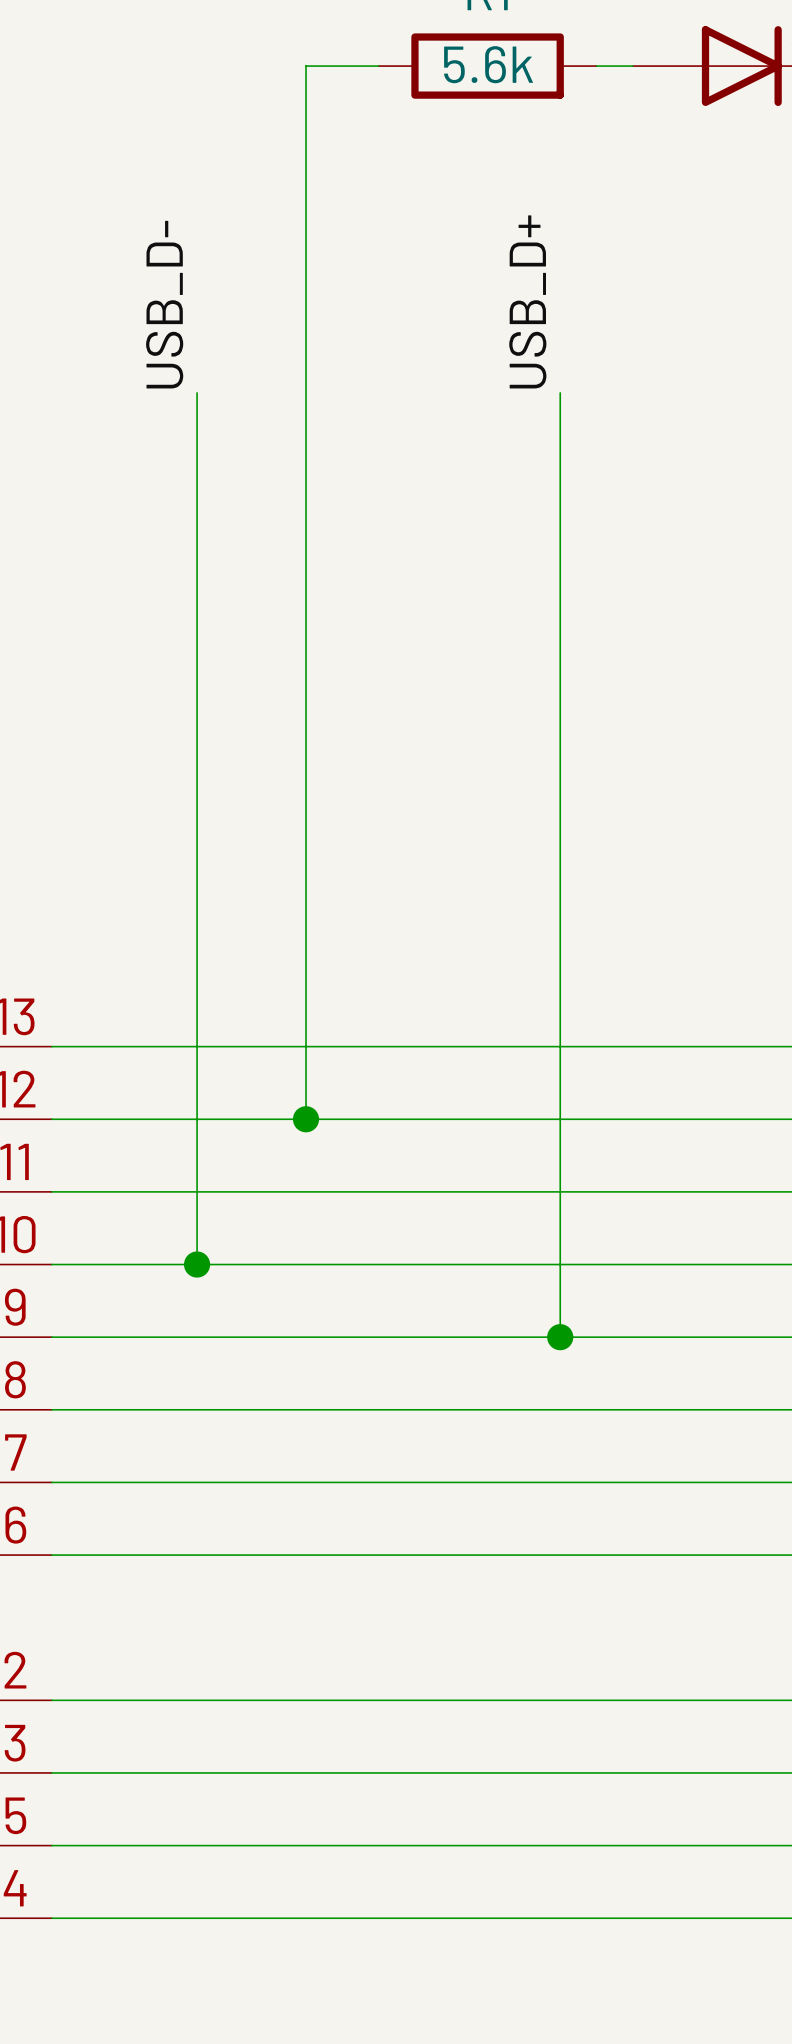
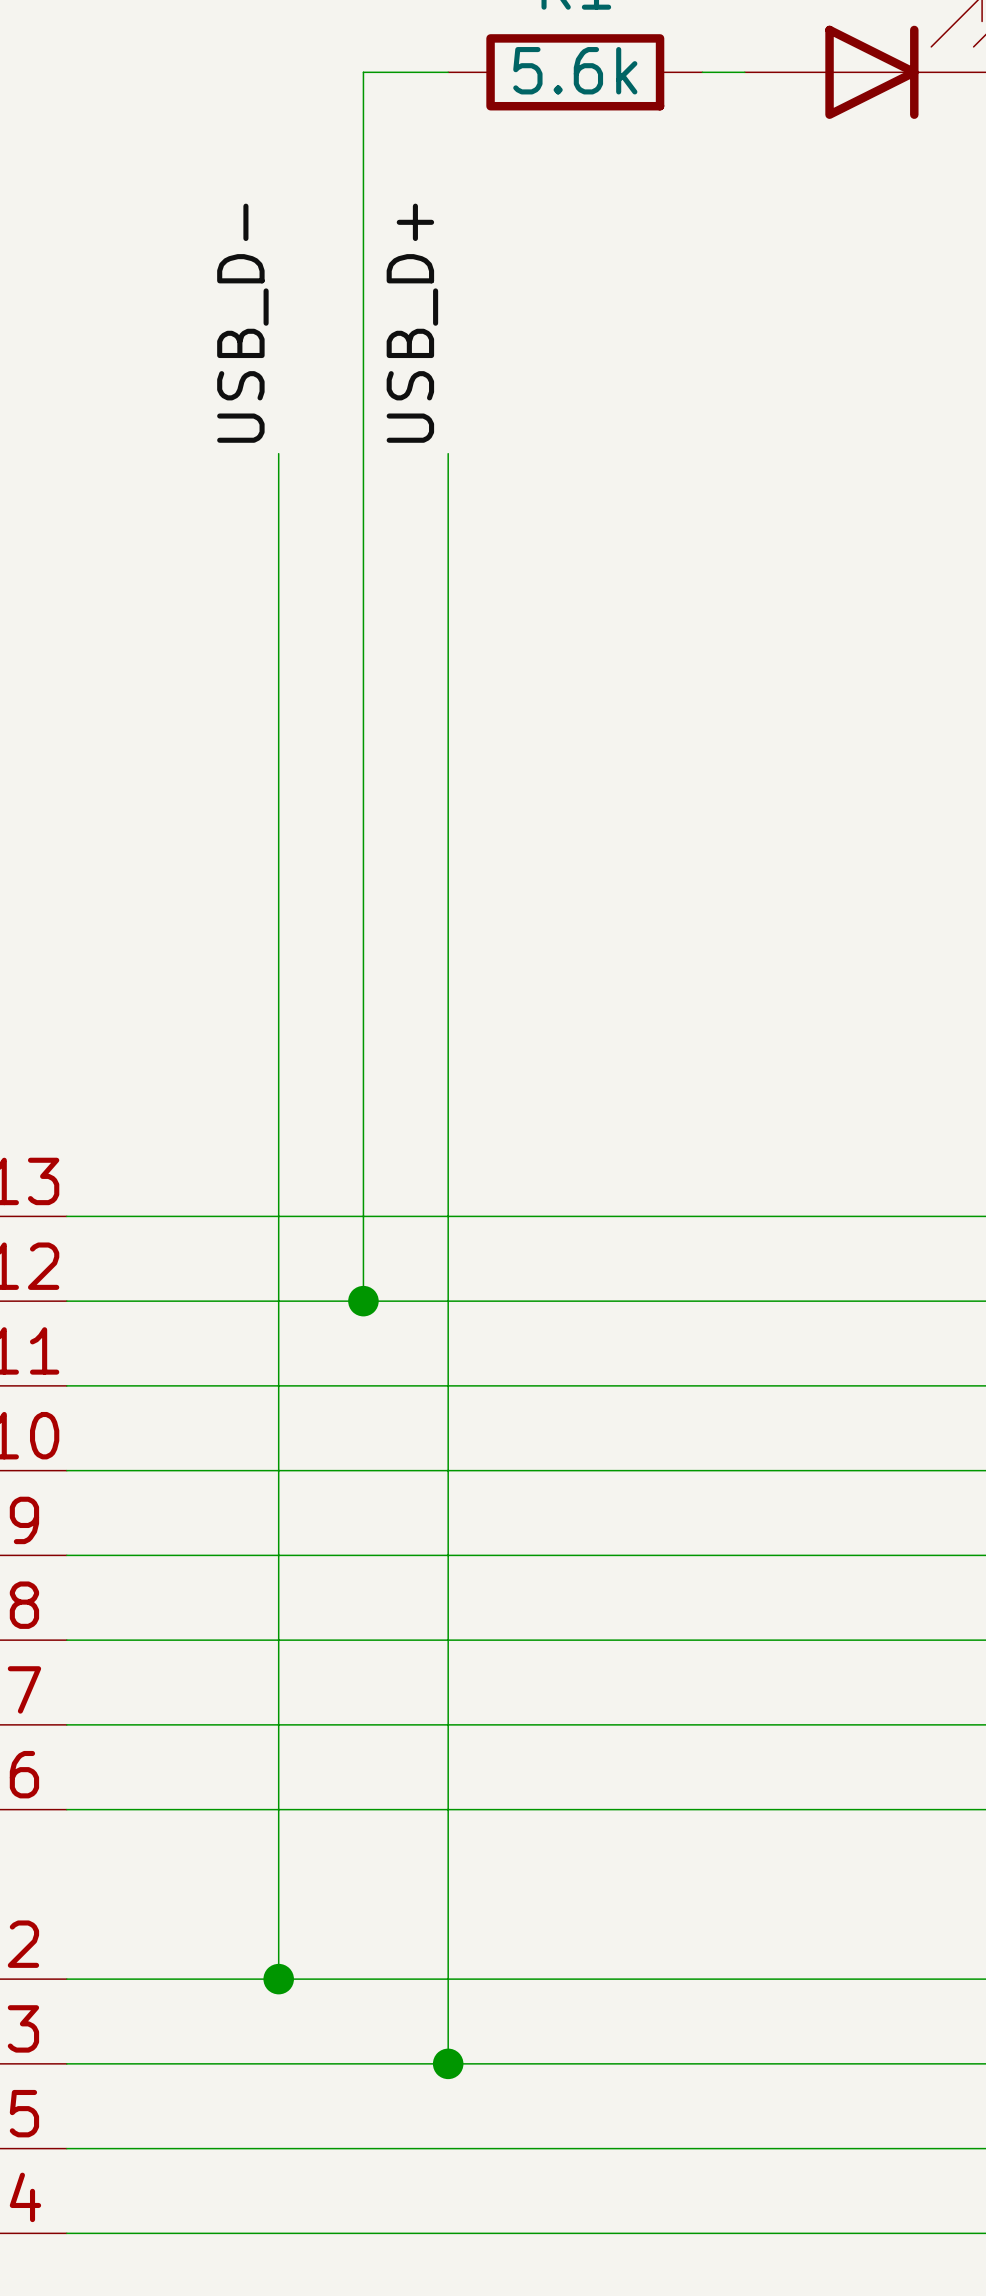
label position: USB_D+ (527, 301) -> USB_D+ (412, 323)
label position: USB_D- (164, 304) -> USB_D- (242, 323)
wire: (197, 392) (197, 1264) -> none
wire: none -> (278, 453) (278, 1979)
wire: none -> (448, 453) (448, 2063)
wire: (560, 392) (560, 1337) -> none
junction: (197, 1264) -> none
junction: (560, 1337) -> none
junction: none -> (278, 1979)
junction: none -> (448, 2063)

